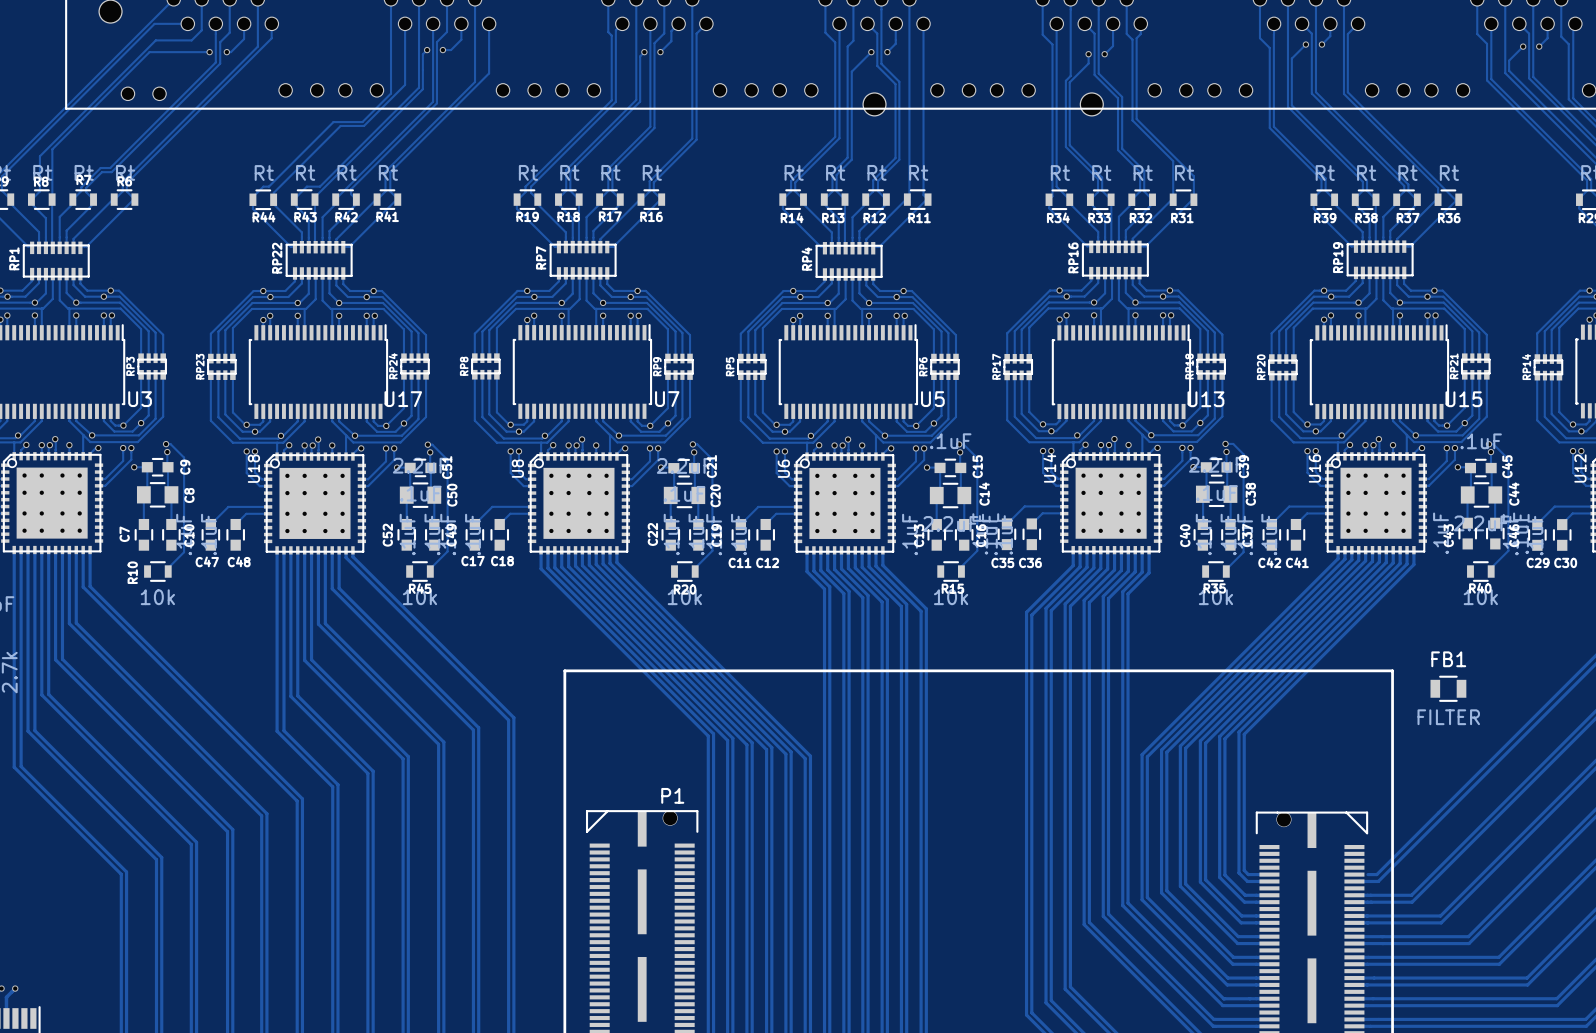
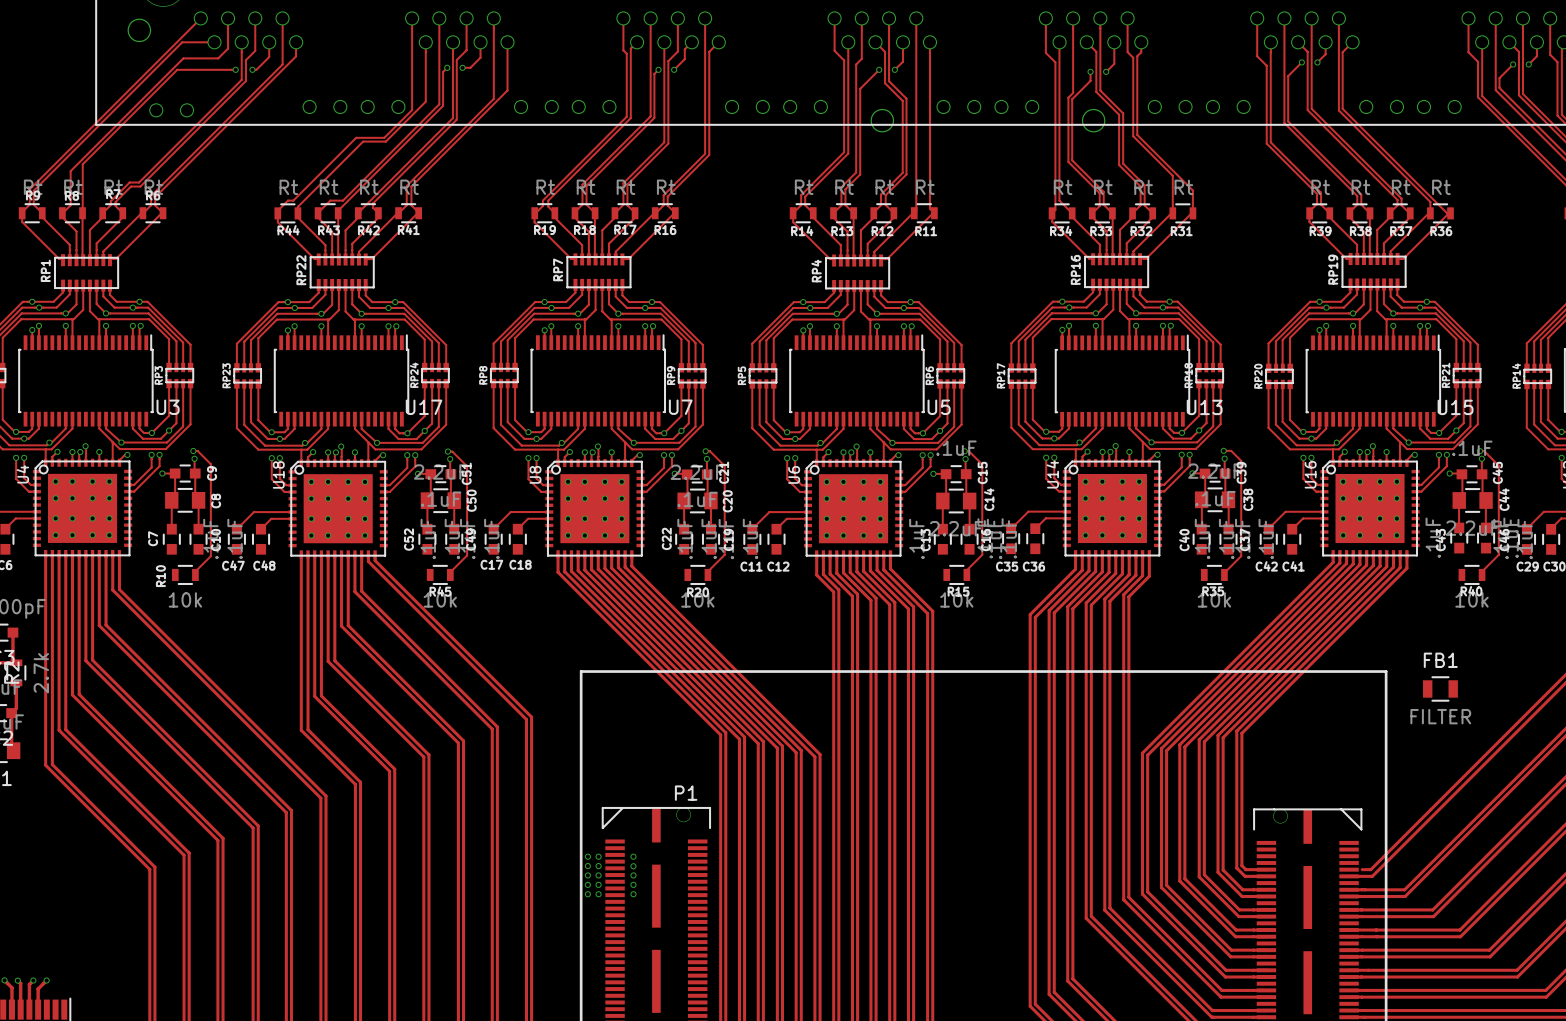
via: none -> (587, 856)
via: none -> (598, 856)
via: none -> (633, 856)
via: none -> (587, 866)
via: none -> (598, 866)
via: none -> (633, 866)
via: none -> (587, 875)
via: none -> (598, 875)
via: none -> (633, 875)
via: none -> (587, 884)
via: none -> (598, 884)
via: none -> (633, 884)
via: none -> (587, 894)
via: none -> (598, 894)
via: none -> (633, 894)

